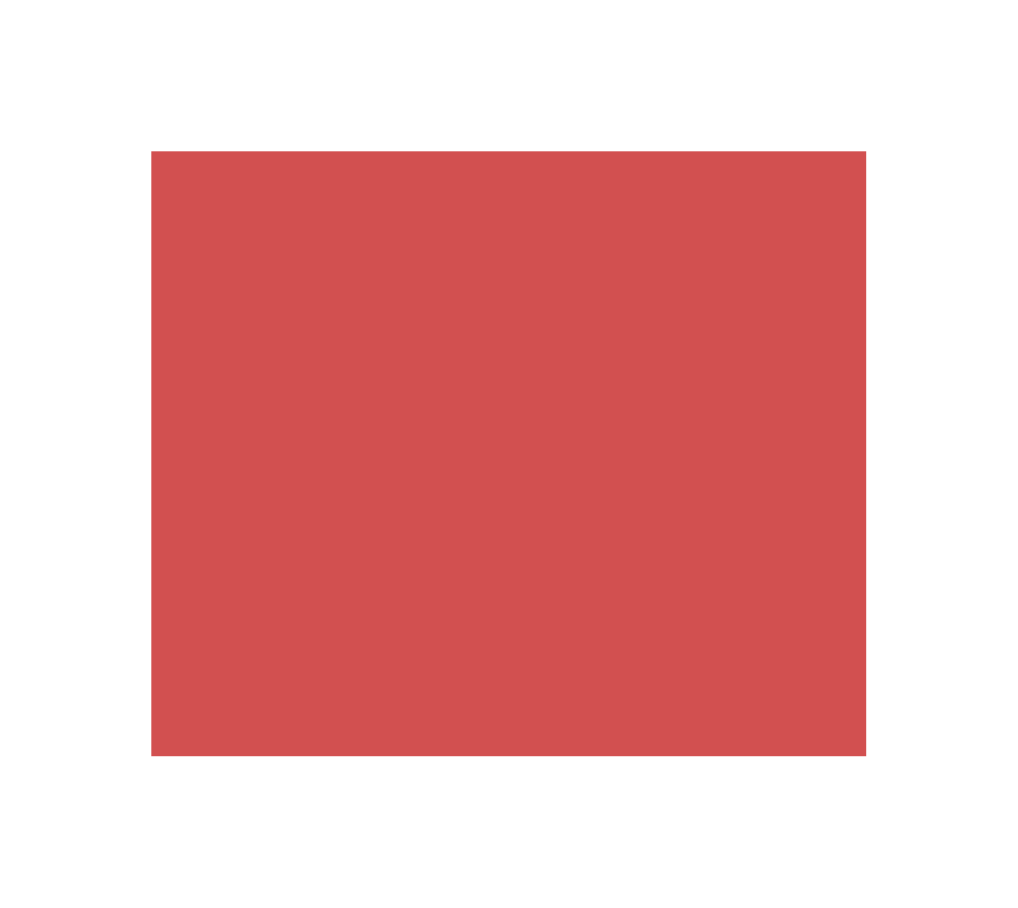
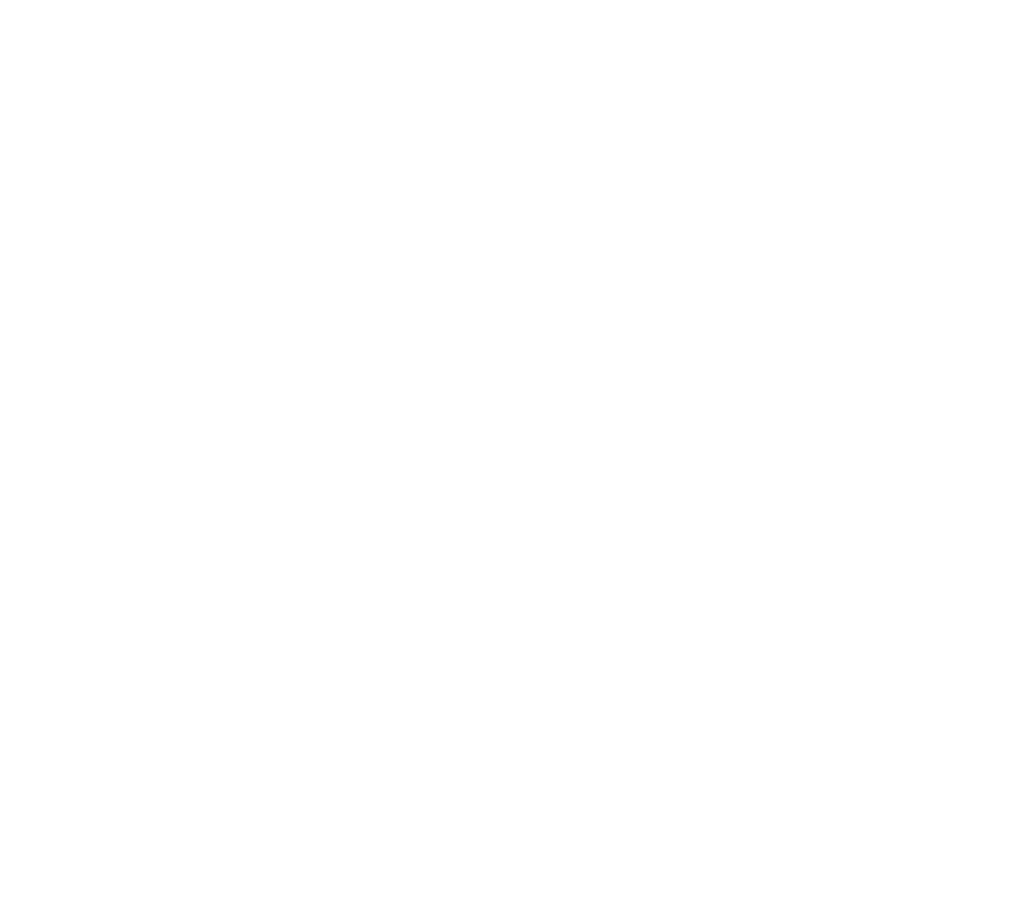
drawing: [151, 151, 867, 757] -> none

